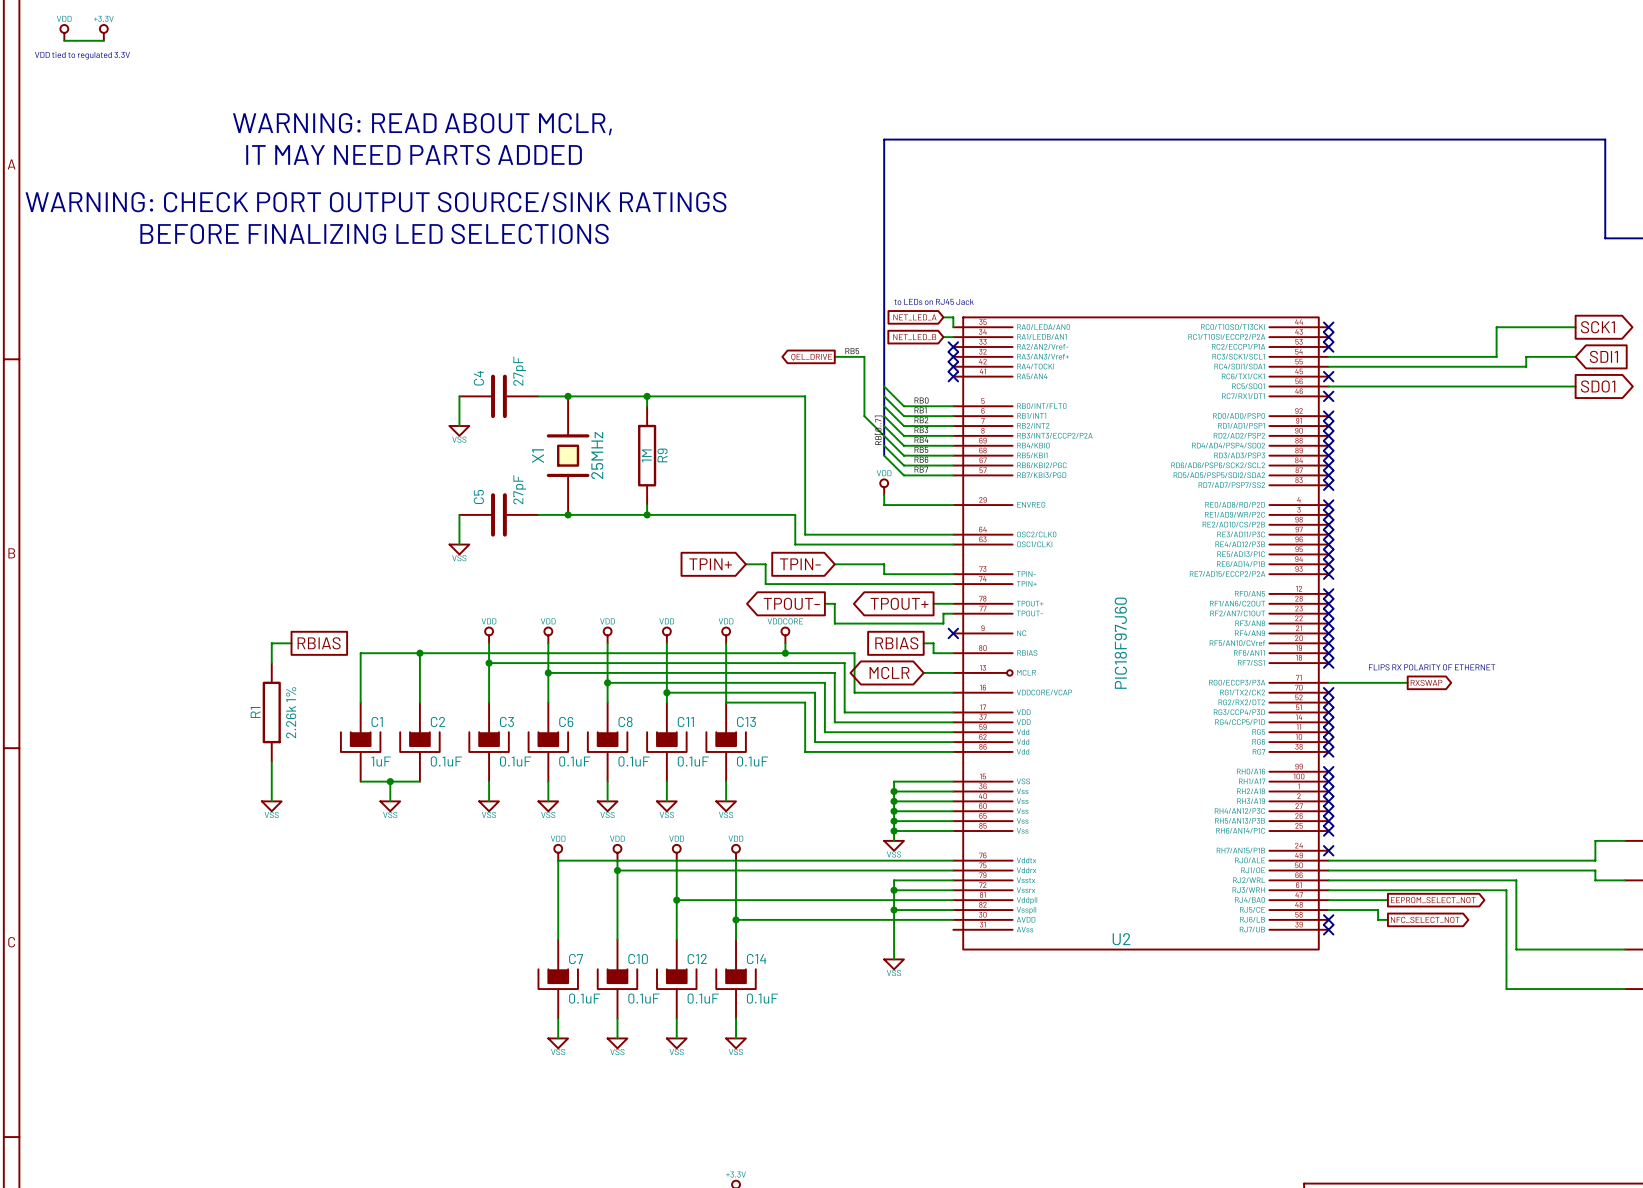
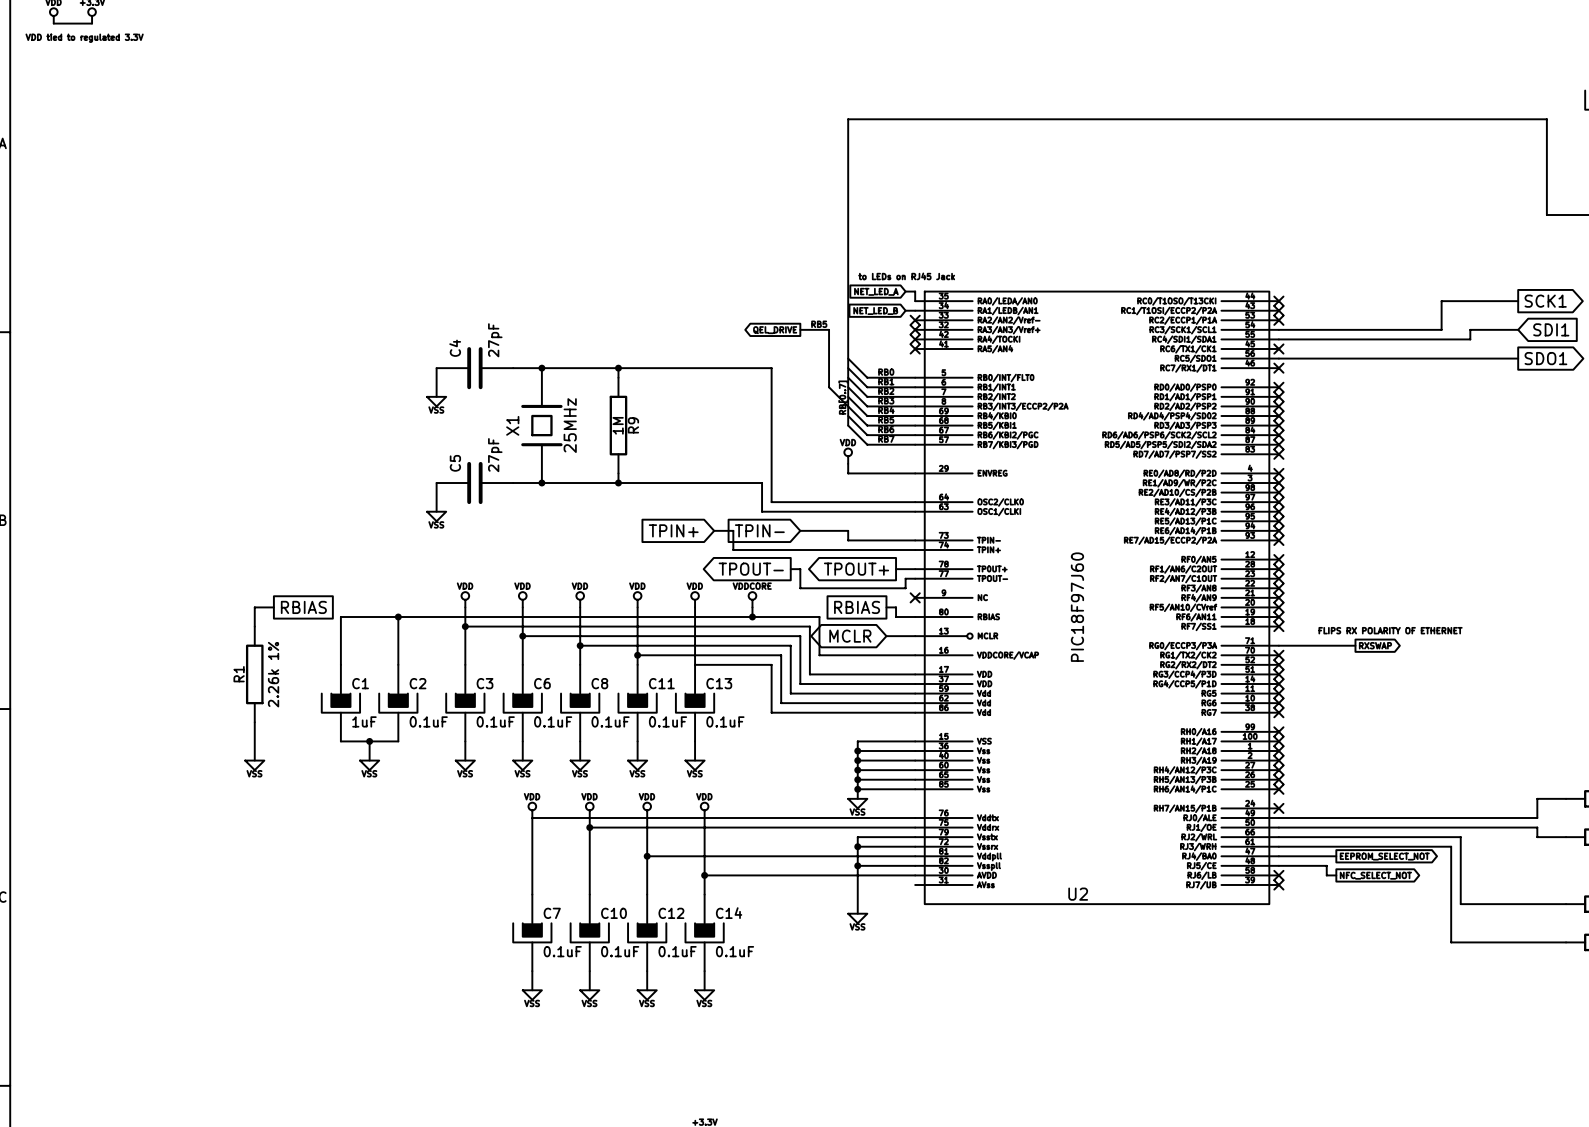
text: WARNING: READ ABOUT MCLR, (422, 124) -> none
text: IT MAY NEED PARTS ADDED (414, 154) -> none
text: WARNING: CHECK PORT OUTPUT SOURCE/SINK RATINGS (376, 202) -> none
text: BEFORE FINALIZING LED SELECTIONS (374, 234) -> none

